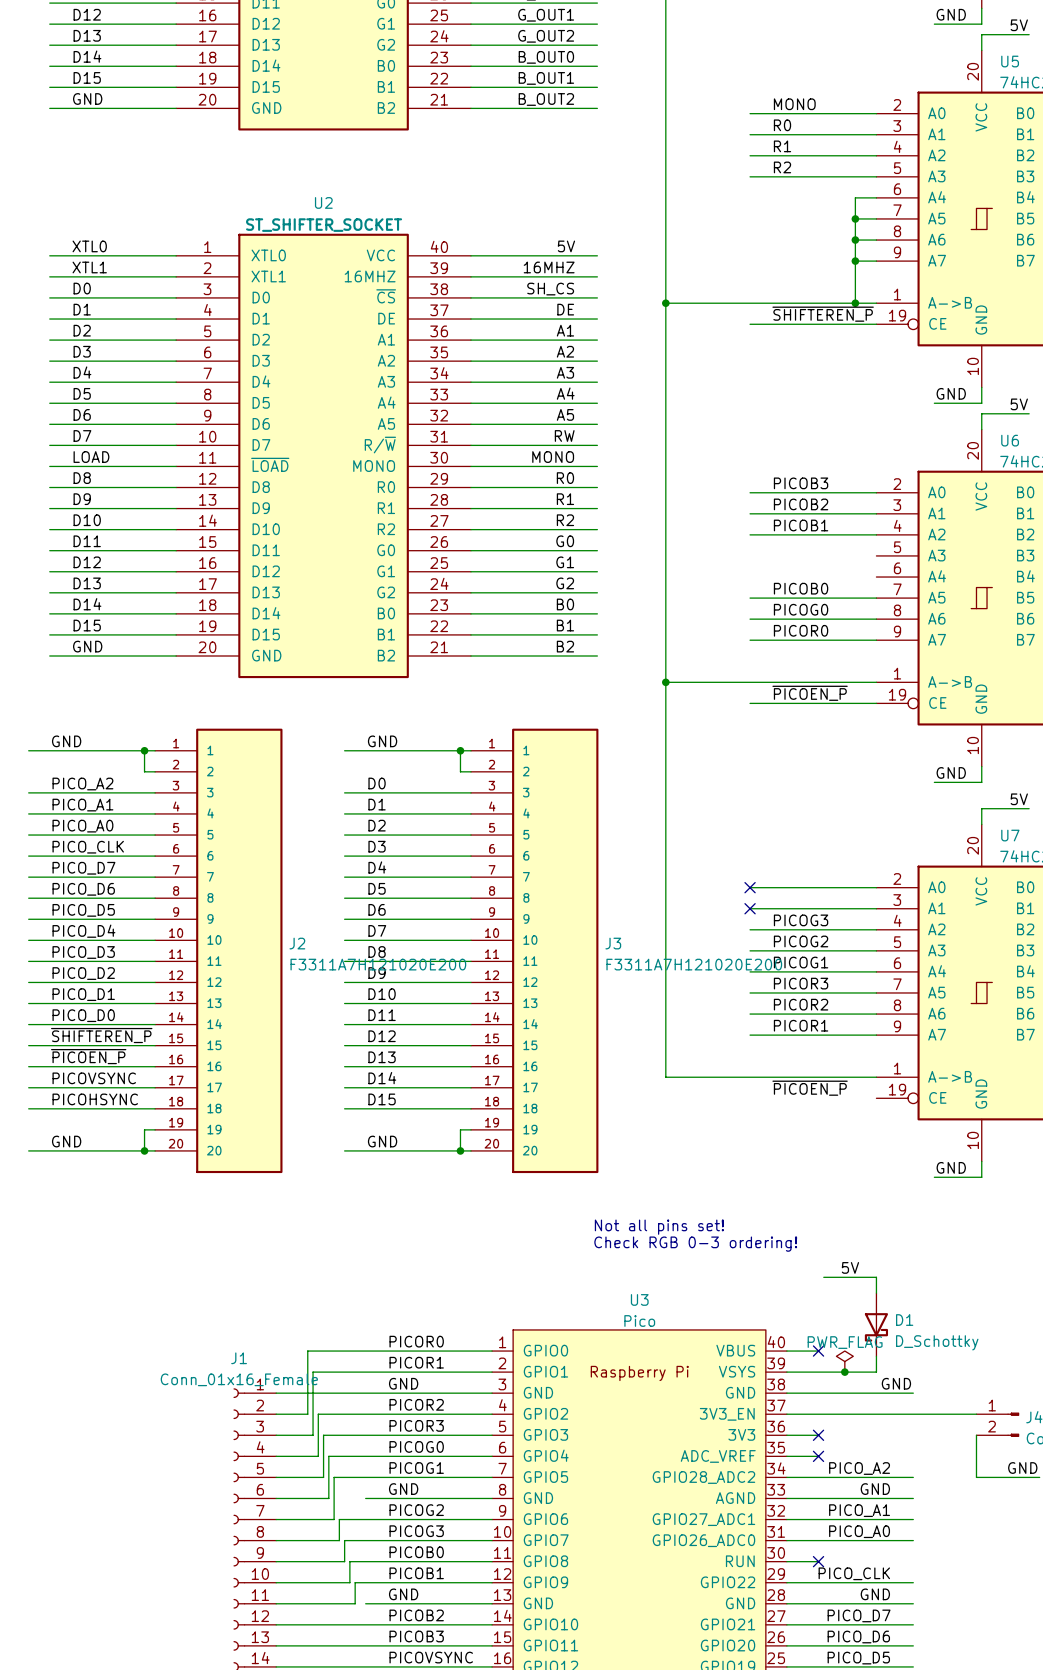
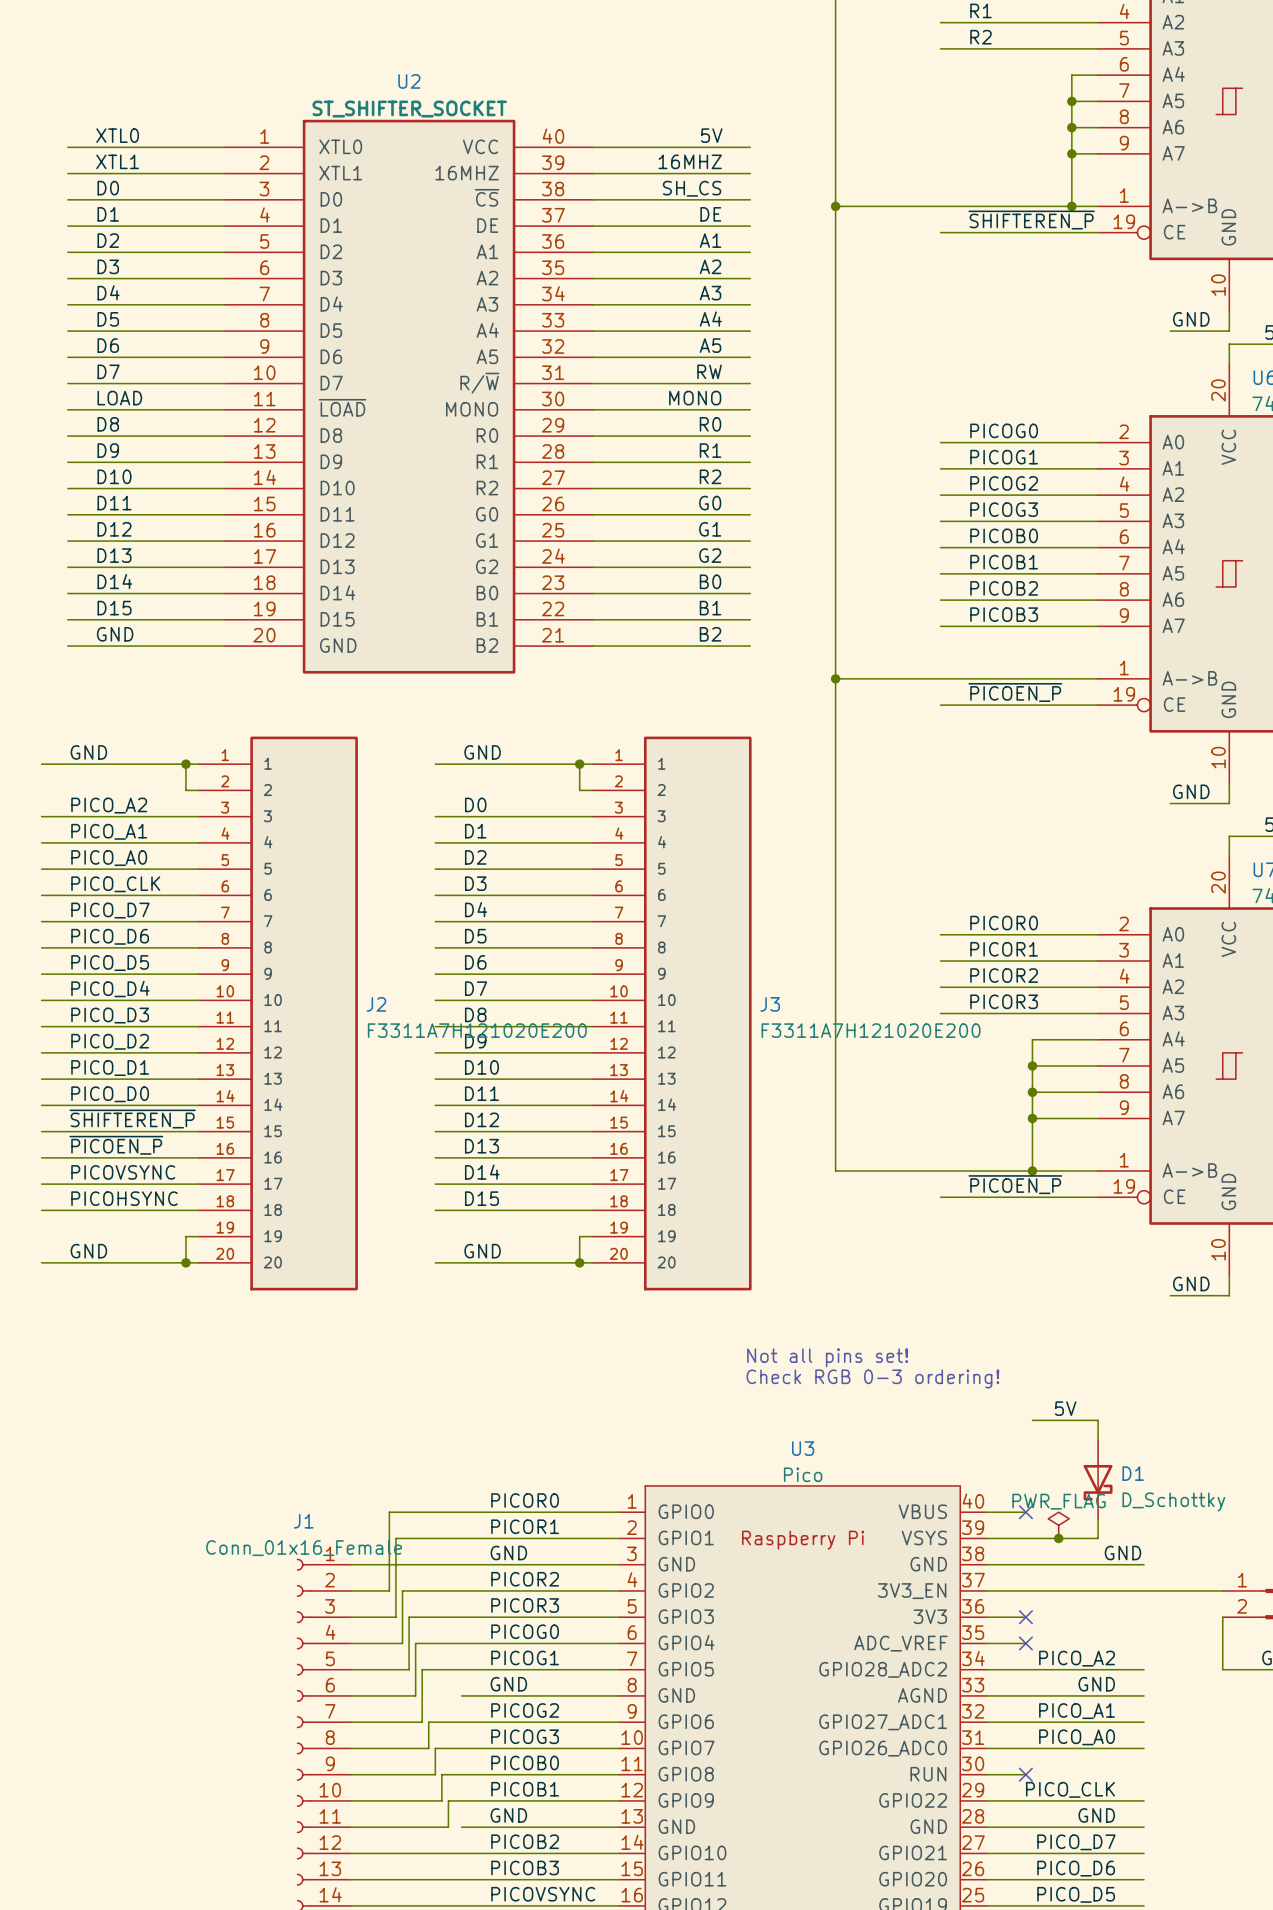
label: PICOB3 (801, 483) -> PICOG0 (1004, 430)
label: PICOB2 (801, 504) -> PICOG1 (1004, 457)
label: PICOB1 (801, 525) -> PICOG2 (1004, 483)
label: none -> PICOG3 (1004, 509)
wire: none -> (940, 521) (1098, 521)
label: none -> PICOB0 (1004, 535)
wire: none -> (940, 547) (1098, 547)
label: PICOB0 (801, 588) -> PICOB1 (1004, 562)
label: PICOG0 (801, 609) -> PICOB2 (1004, 588)
label: PICOR0 (801, 630) -> PICOB3 (1004, 614)
label: none -> PICOR0 (1004, 923)
no-connect mark: (750, 887) -> none
no-connect mark: (750, 908) -> none
label: PICOG3 (801, 920) -> PICOR2 (1004, 975)
label: PICOG2 (801, 941) -> PICOR3 (1004, 1001)
label: PICOG1 (801, 962) -> none
wire: (750, 971) (823, 971) -> (1032, 1171) (1032, 1039)
label: PICOR3 (801, 983) -> none
wire: (750, 992) (823, 992) -> none
junction: none -> (1032, 1066)
label: PICOR2 (801, 1004) -> none
wire: (750, 1014) (823, 1014) -> none
junction: none -> (1032, 1092)
label position: PICOR1 (801, 1025) -> PICOR1 (1004, 949)
wire: (750, 1035) (823, 1035) -> none
junction: none -> (1032, 1118)
junction: none -> (1032, 1171)
wire: none -> (940, 1197) (1098, 1197)

